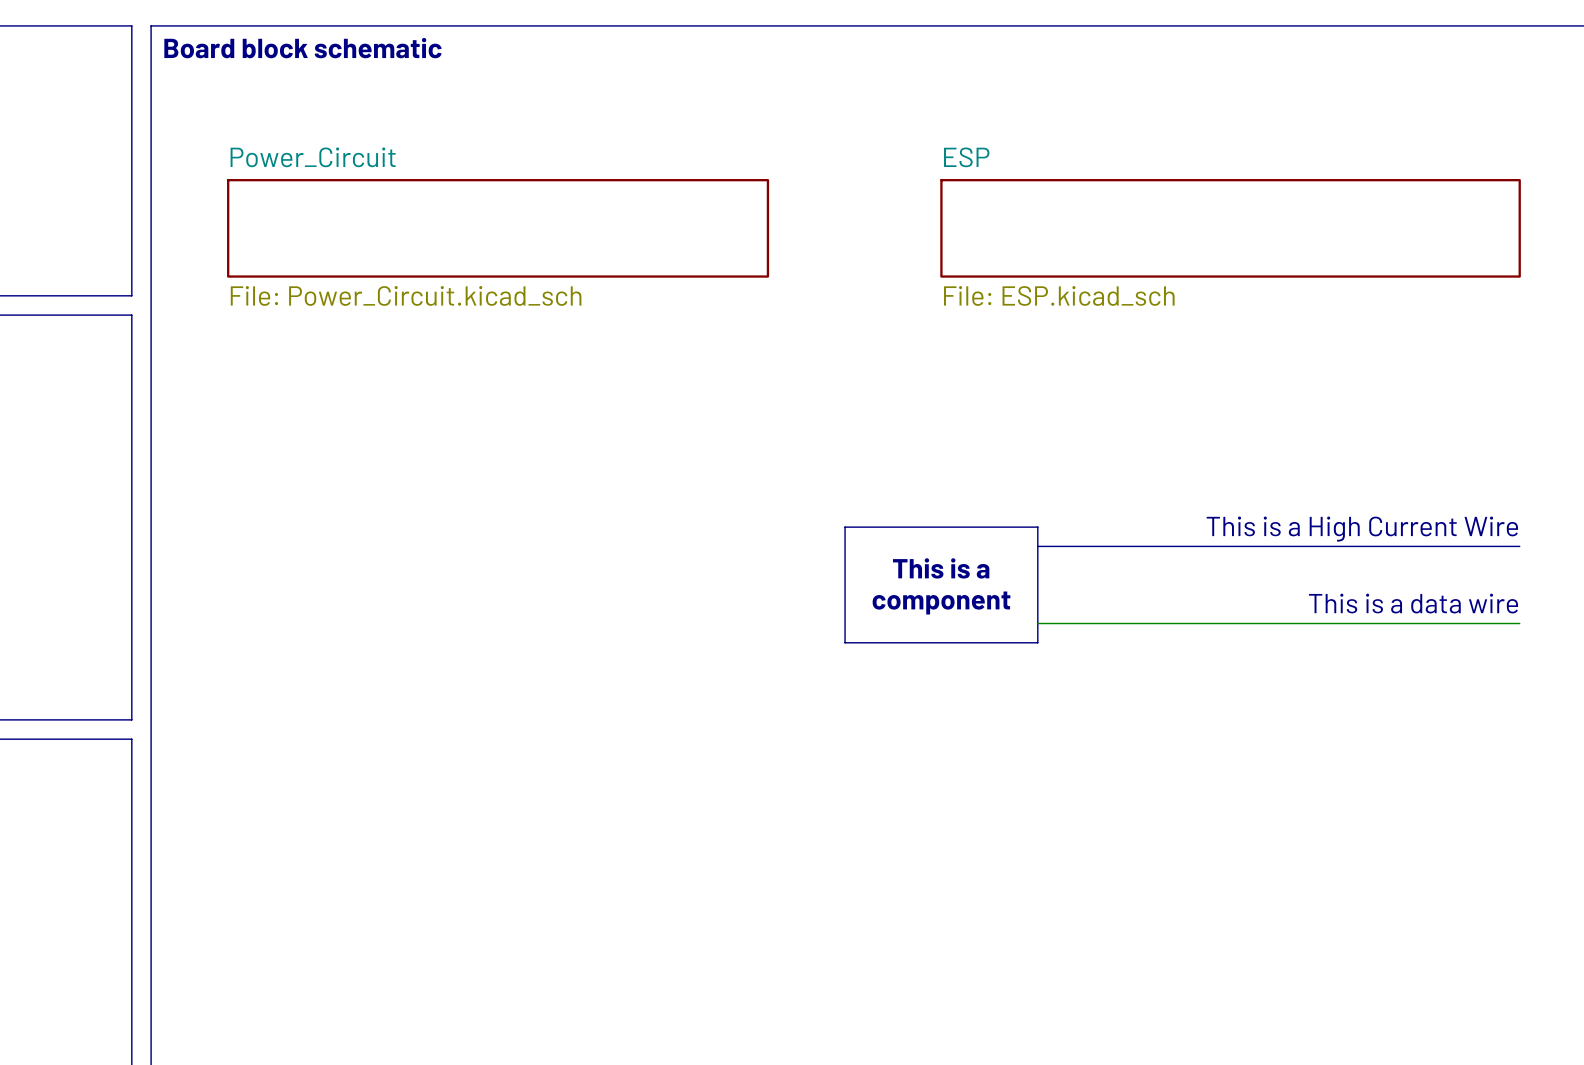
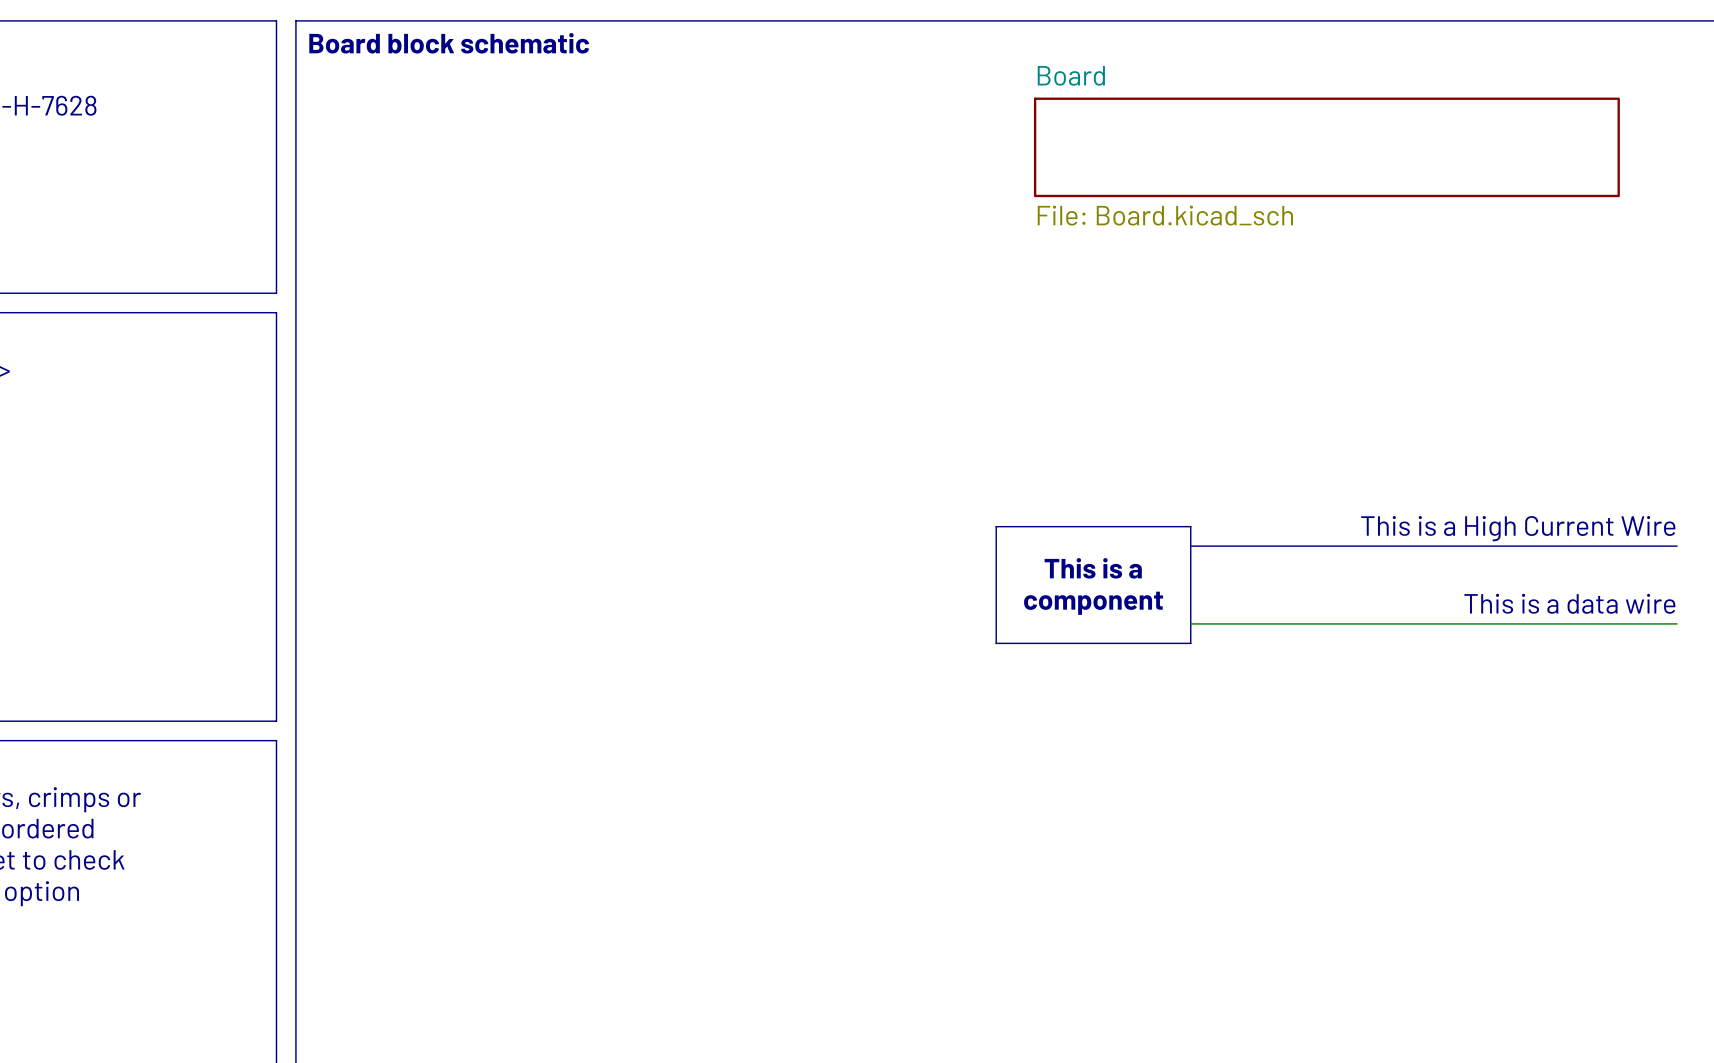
sheet Board: none -> File: Board.kicad_sch (1326, 147)
sheet Power_Circuit: File: Power_Circuit.kicad_sch (498, 228) -> none
sheet ESP: File: ESP.kicad_sch (1230, 228) -> none

